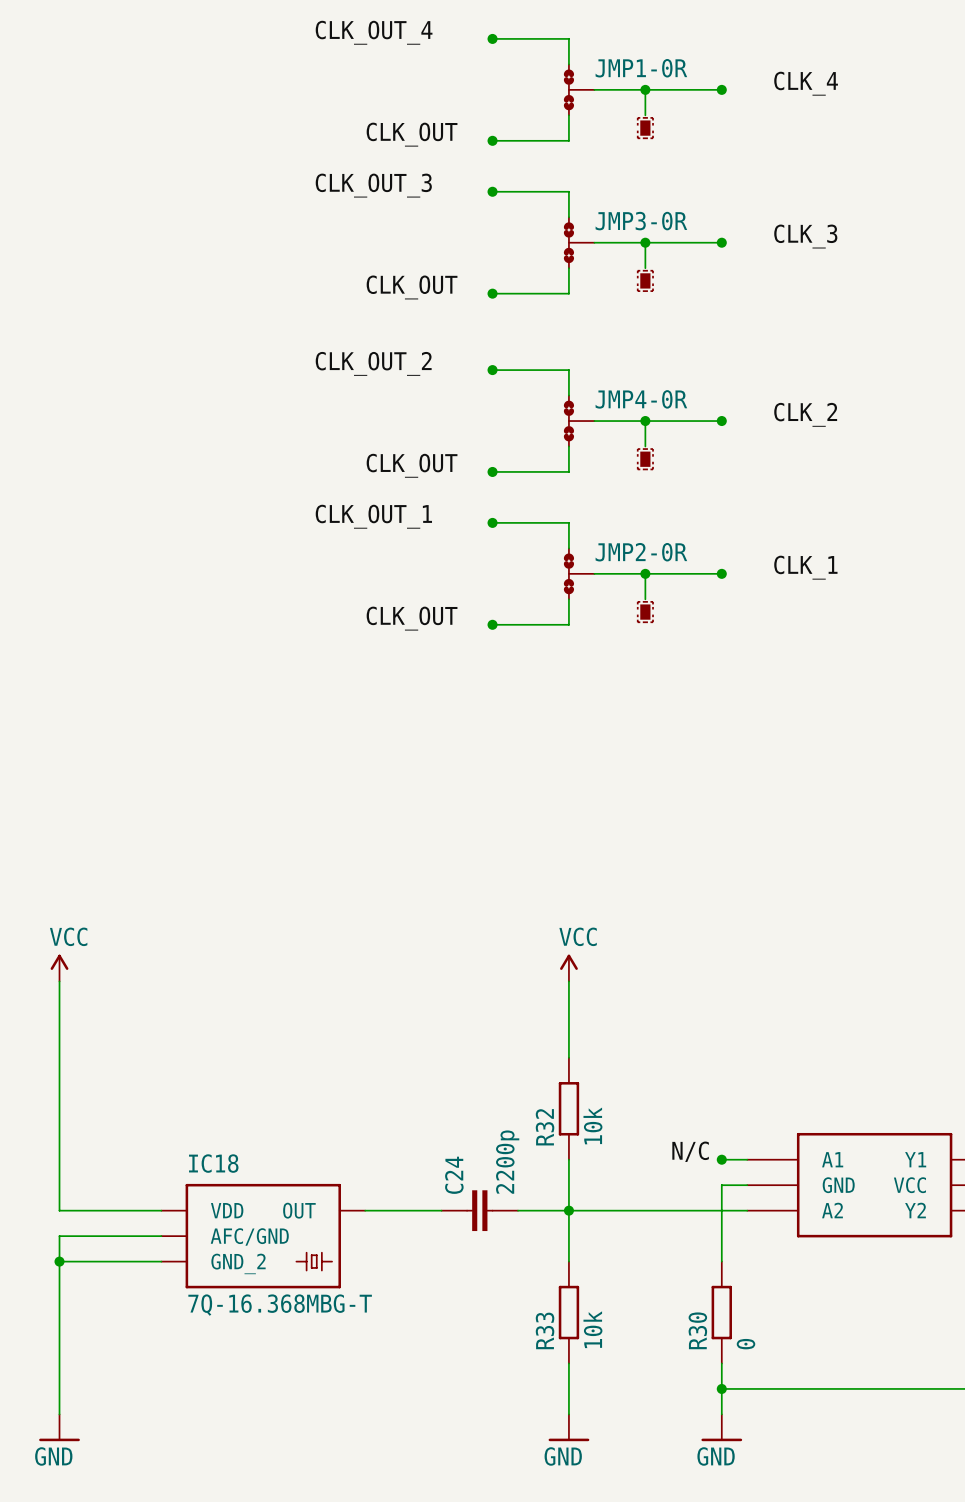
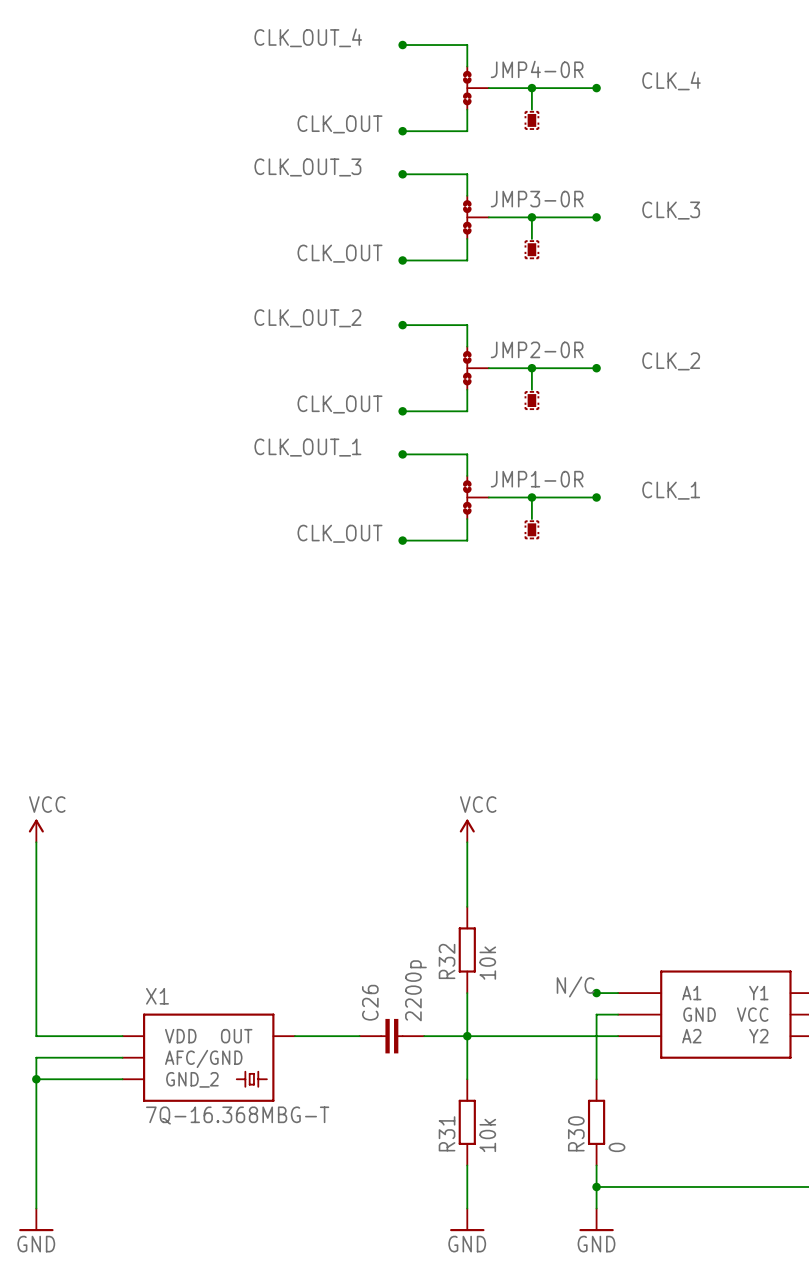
JMP1-0R name: JMP1-0R (641, 68) -> JMP4-0R (537, 69)
JMP4-0R name: JMP4-0R (641, 399) -> JMP2-0R (537, 349)
JMP2-0R name: JMP2-0R (641, 552) -> JMP1-0R (537, 479)
IC18 name: IC18 (213, 1163) -> X1 (157, 996)
C24 name: C24 (454, 1175) -> C26 (370, 1002)
R33 name: R33 (545, 1330) -> R31 (447, 1133)

